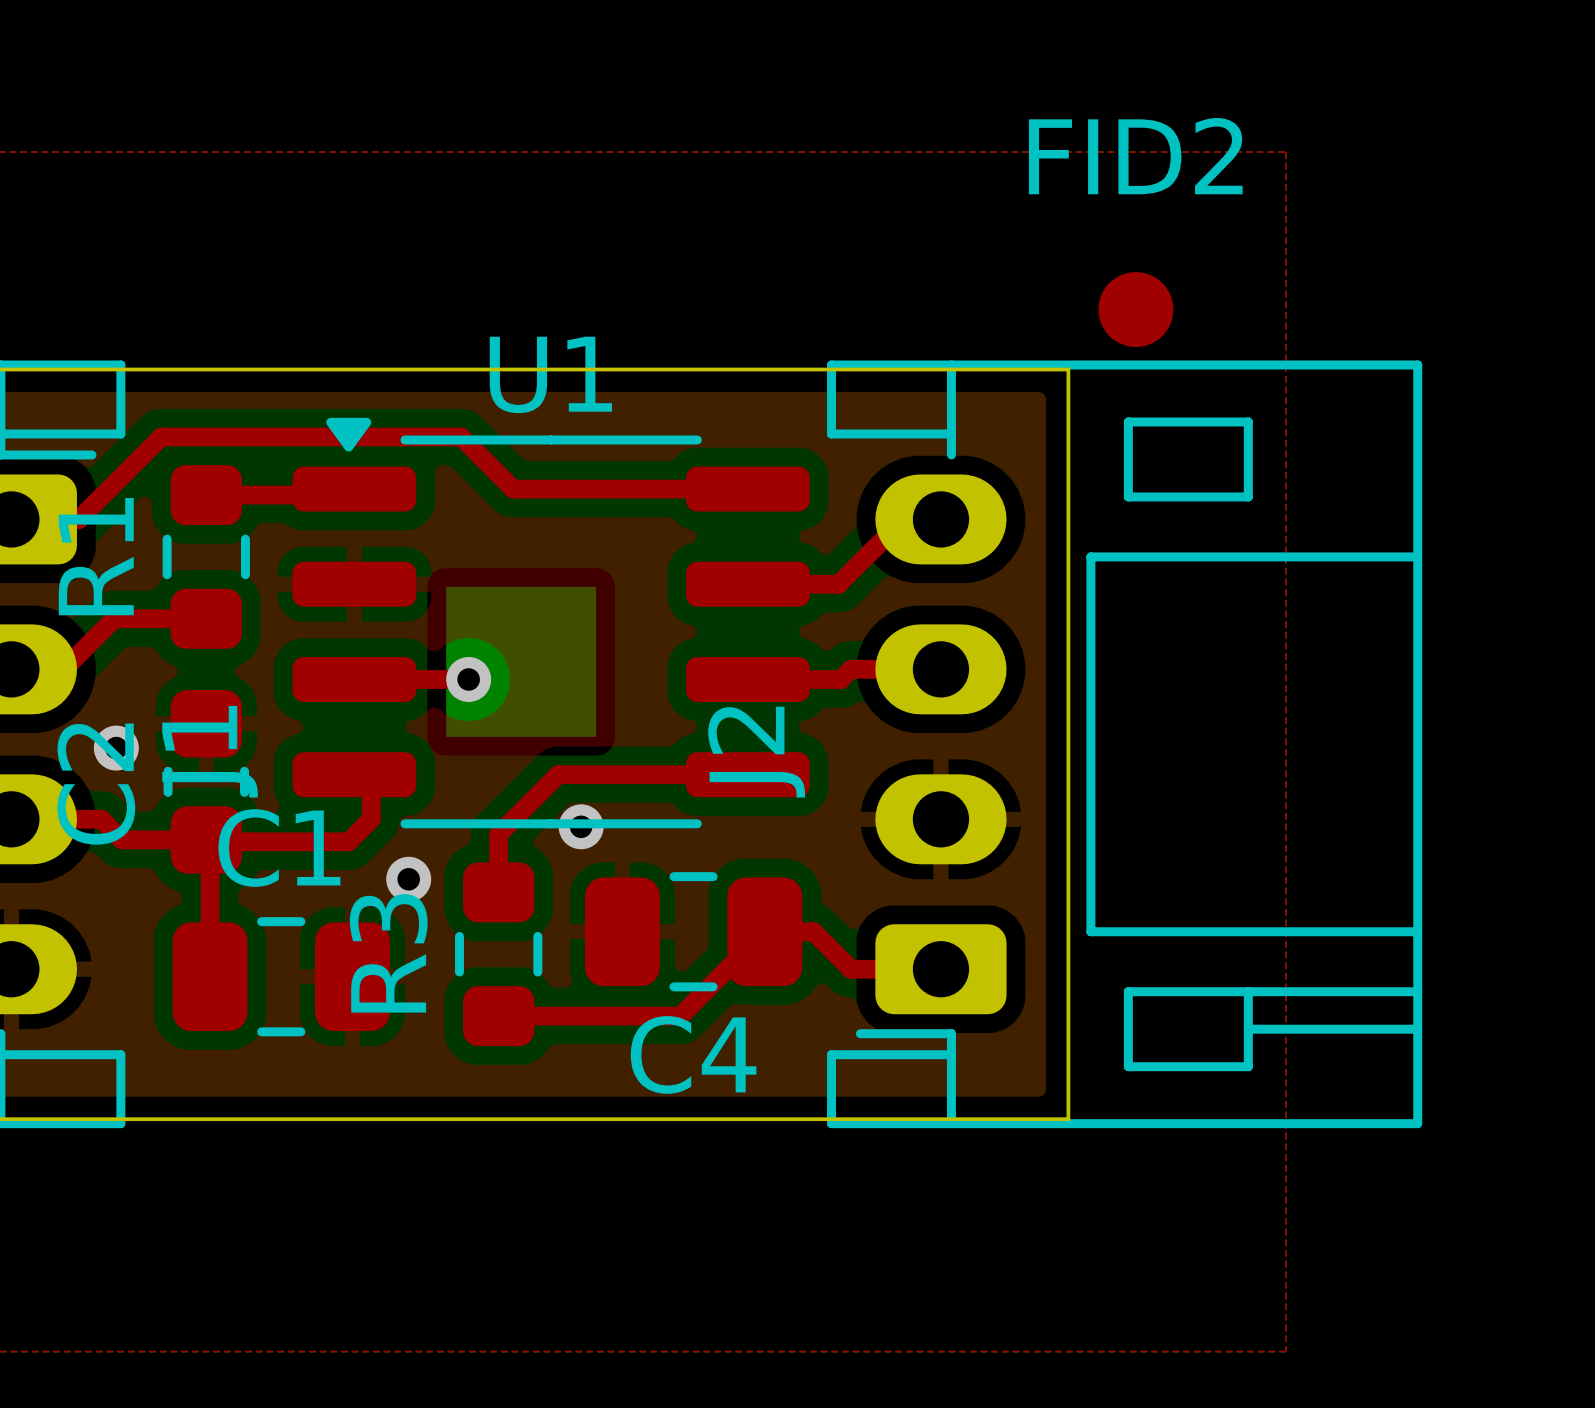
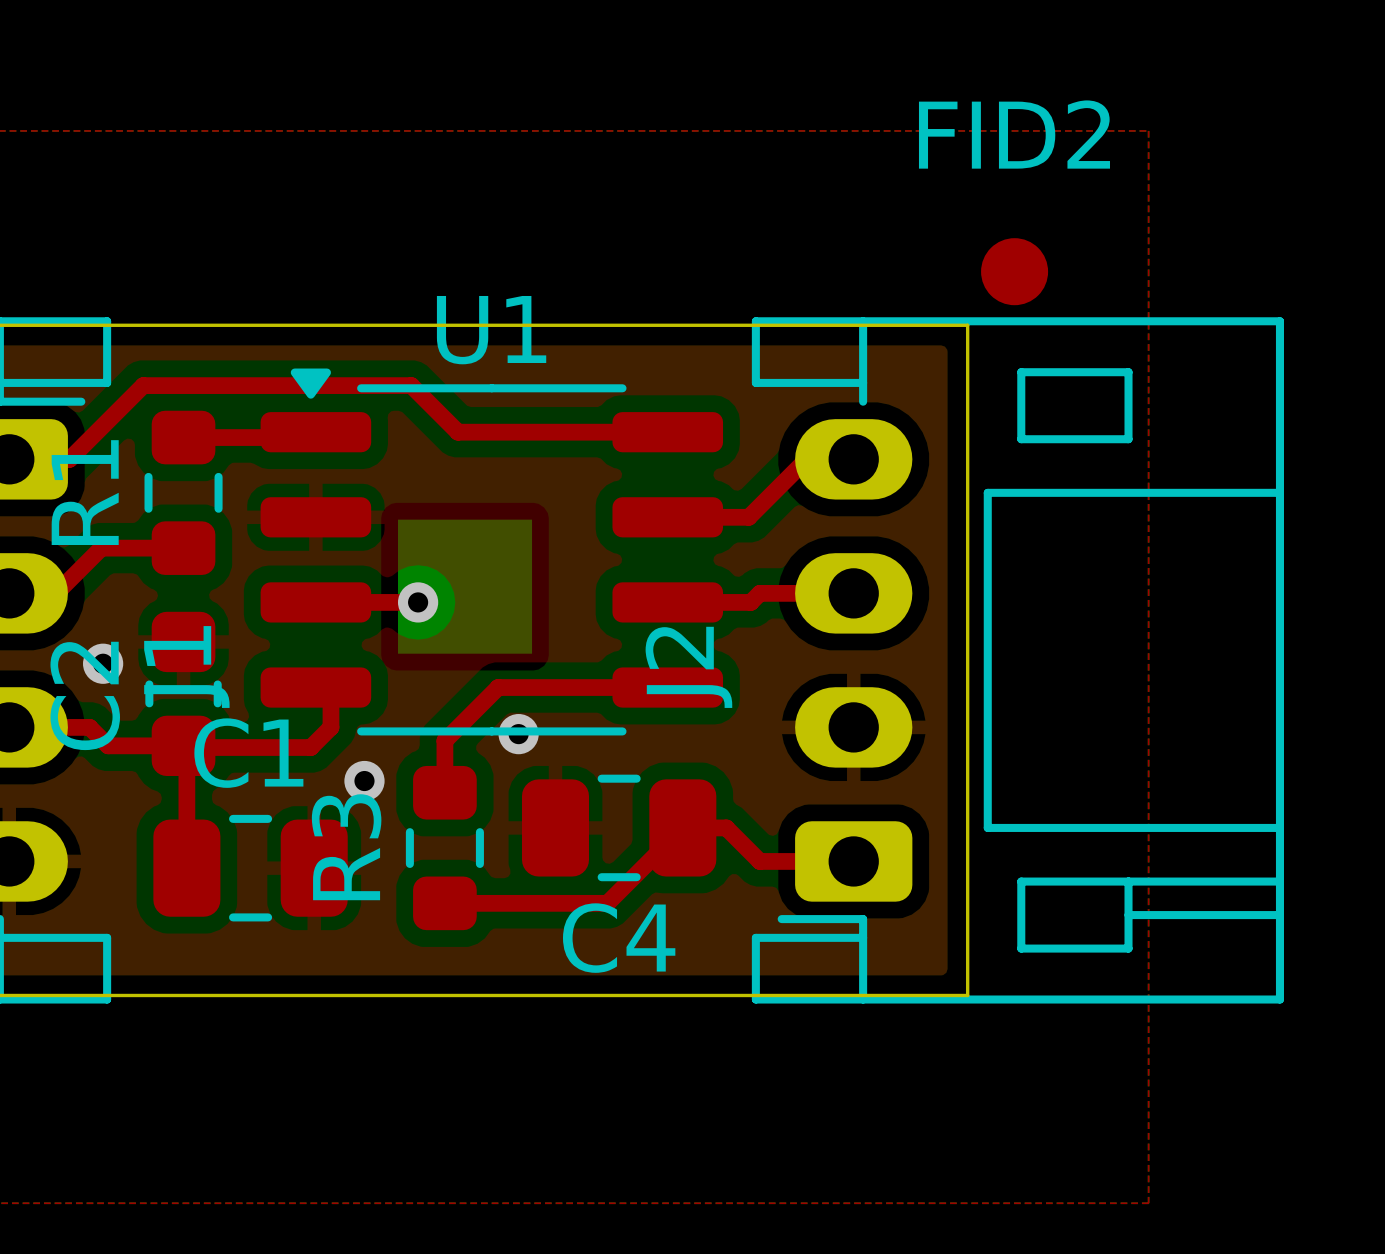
board edge: (1068, 369) (1068, 1119) -> (954, 325) (967, 325) (967, 995) (954, 995)
J2 position: (1124, 744) -> (1017, 660)

